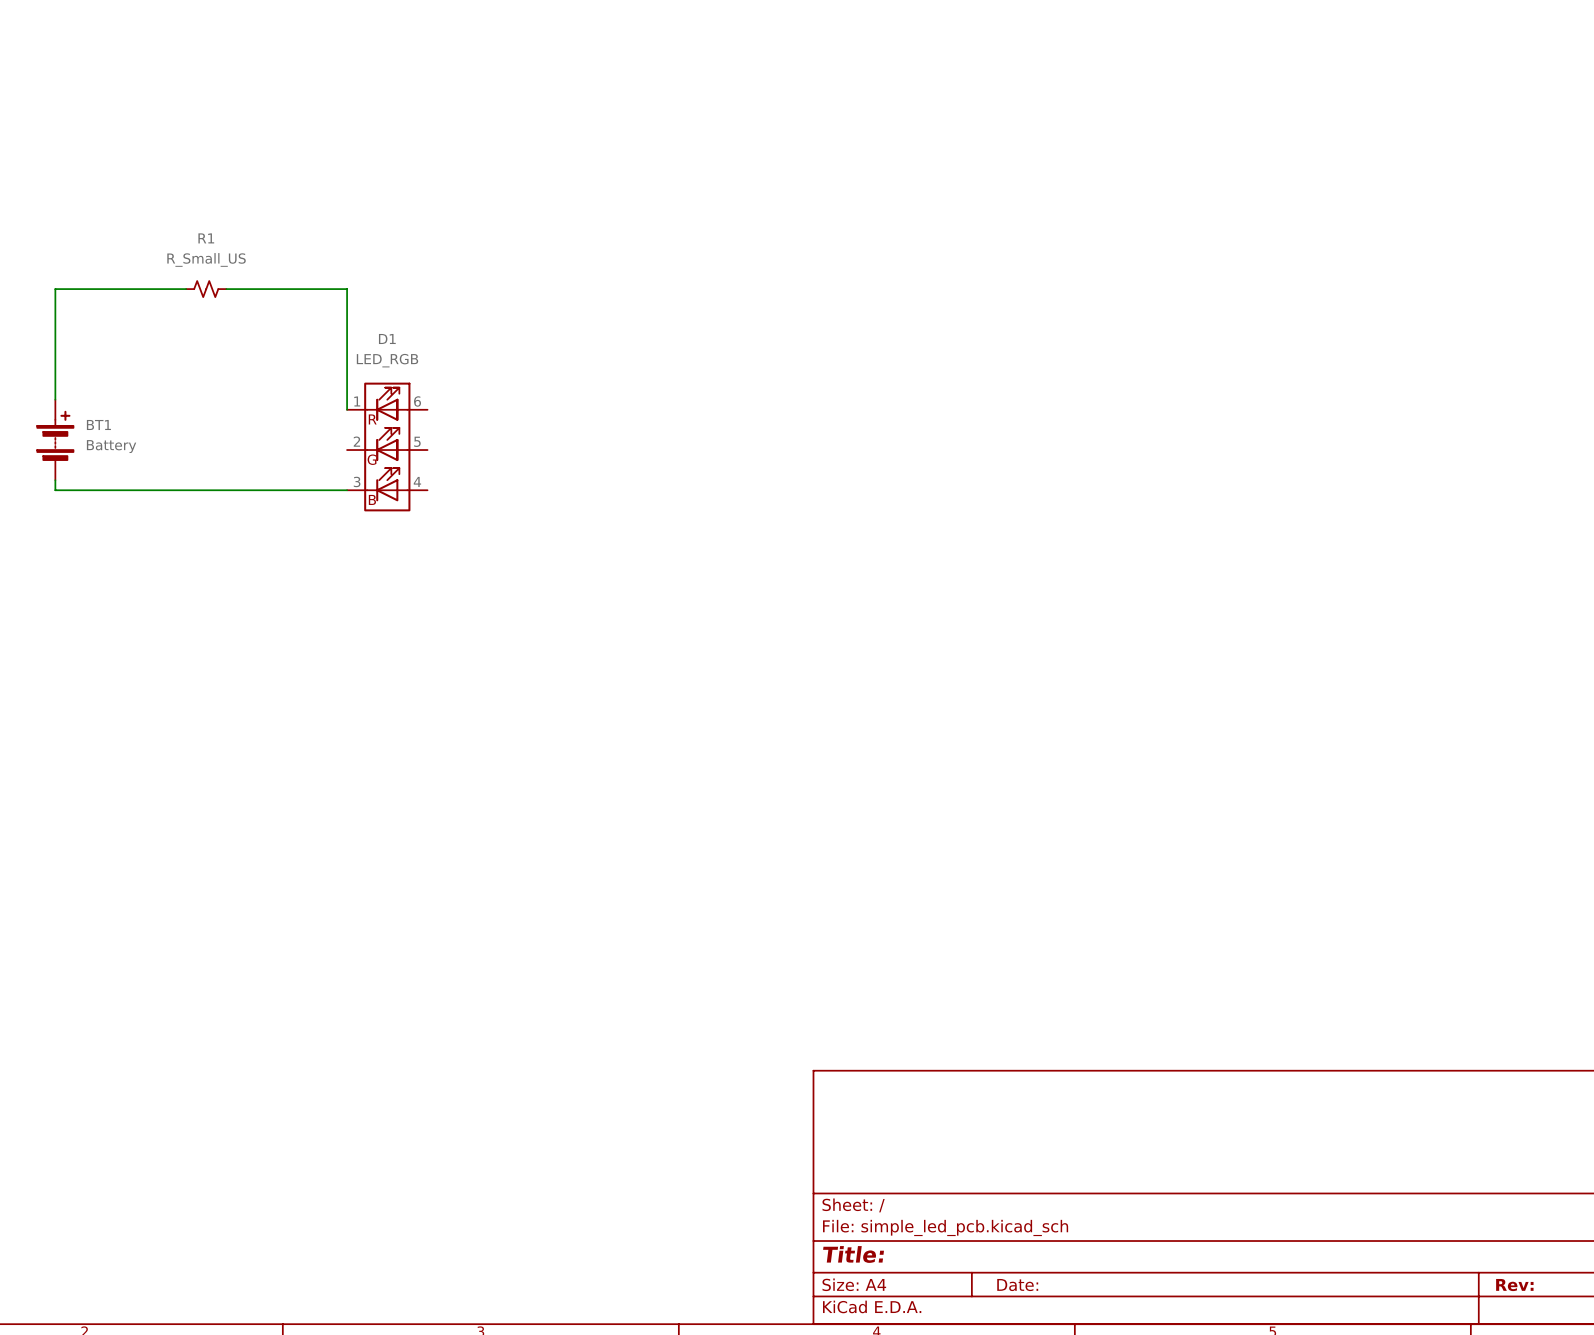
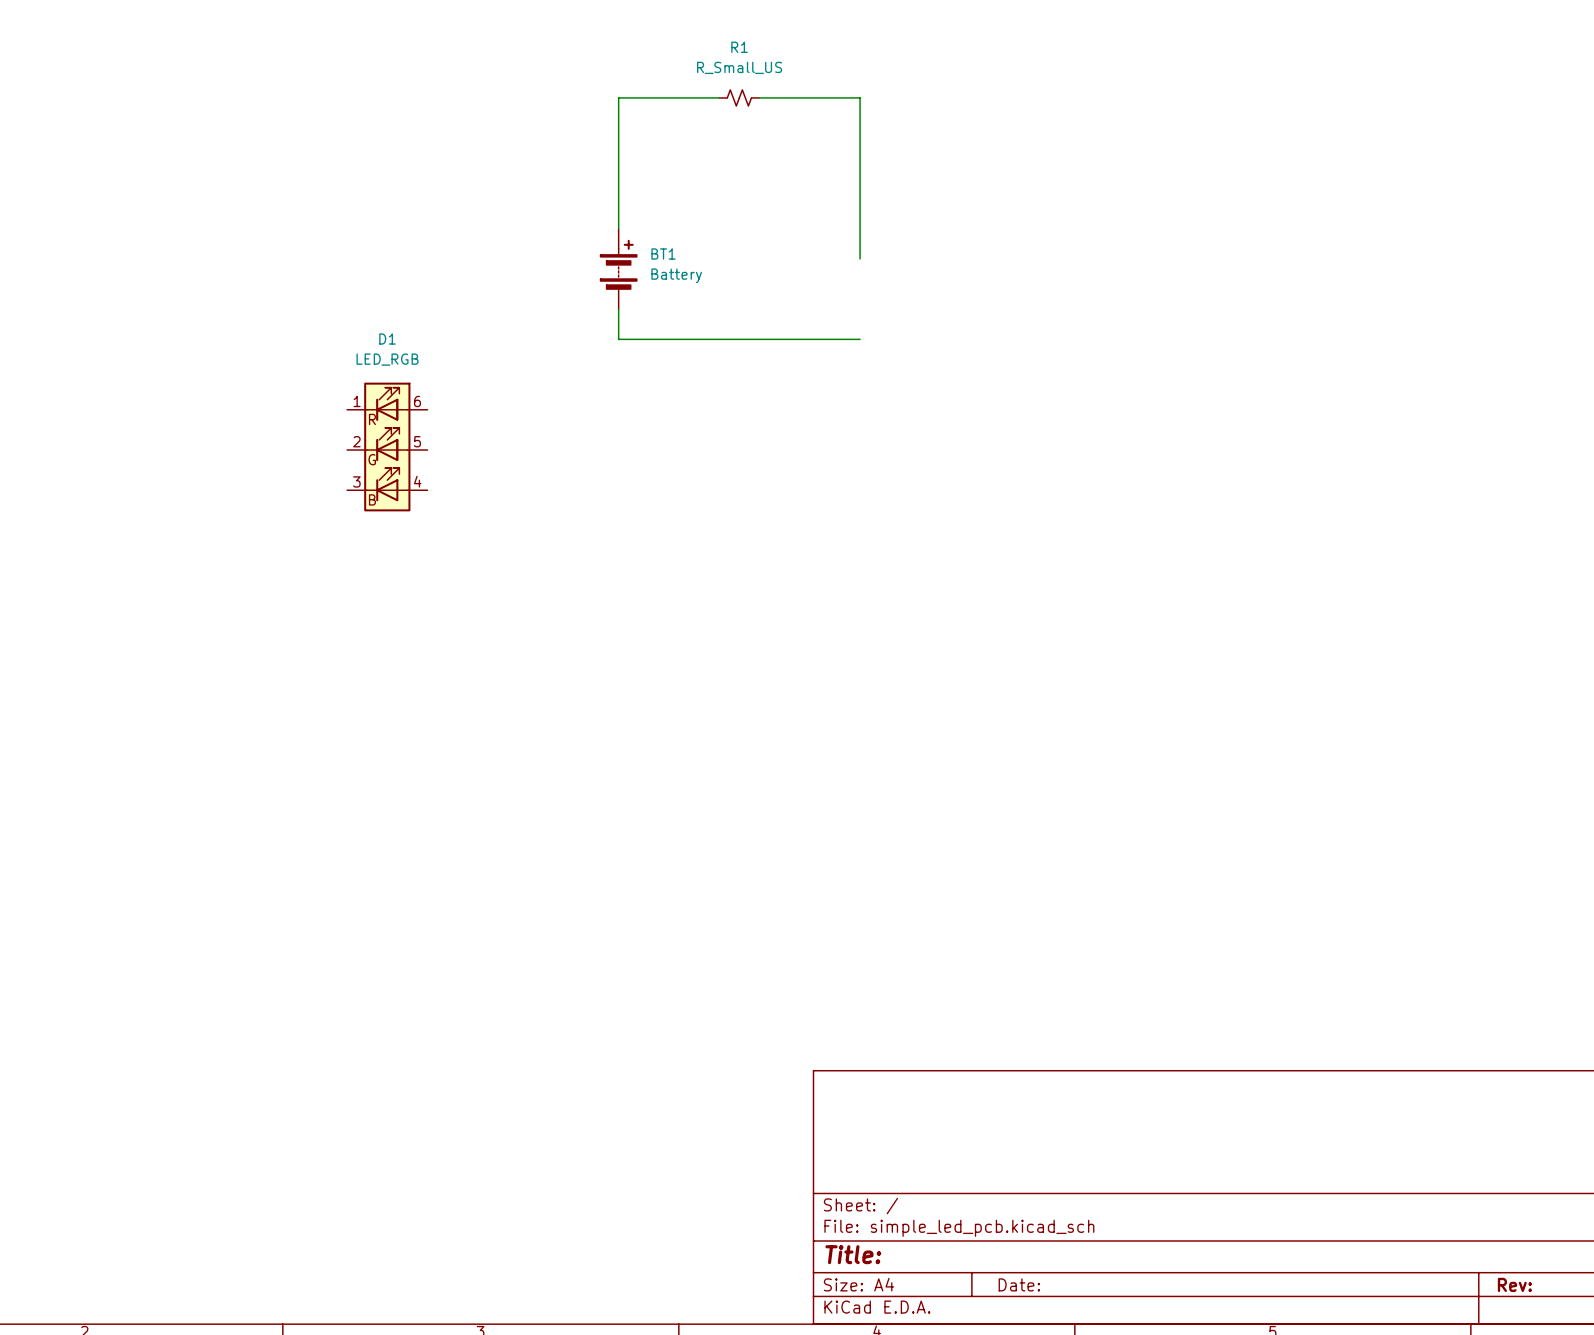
wire: none -> (719, 97) (618, 97) (618, 228)
wire: none -> (759, 97) (860, 97) (860, 258)
wire: (186, 289) (55, 289) (55, 399) -> none
R1 position: (206, 289) -> (739, 97)
wire: (226, 289) (347, 289) (347, 409) -> none
wire: none -> (618, 309) (618, 339) (860, 339)
BT1 position: (55, 439) -> (618, 268)
wire: (55, 480) (55, 490) (347, 490) -> none

